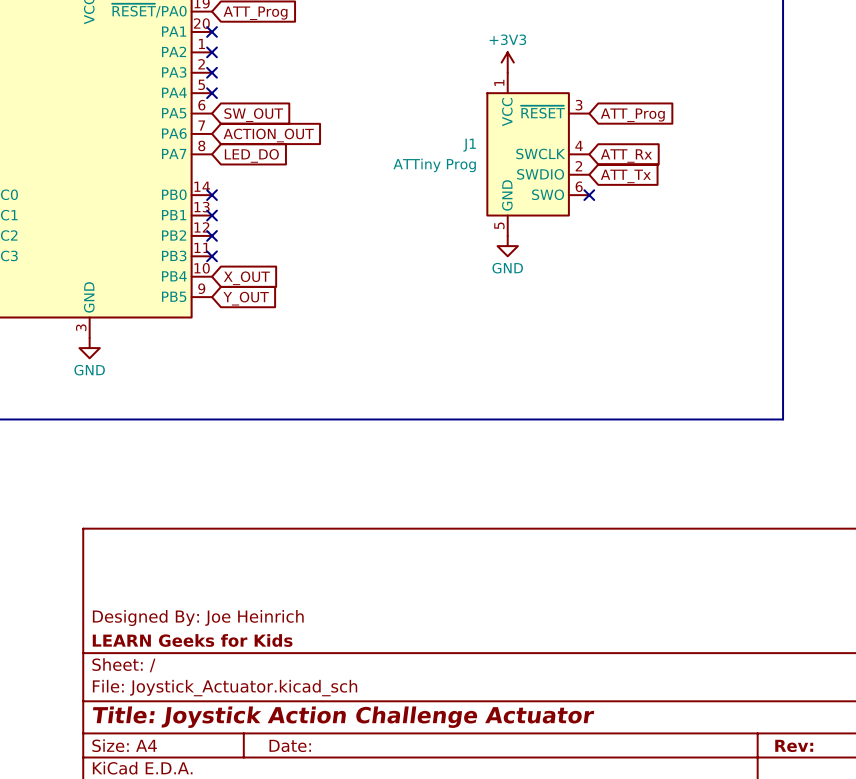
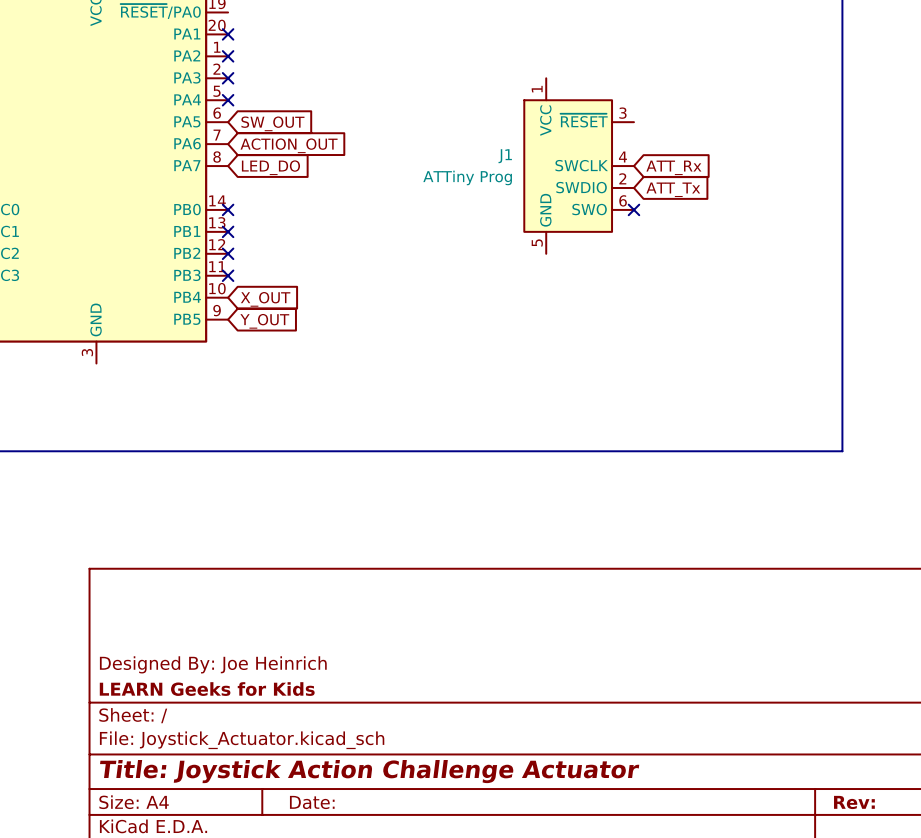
global label: ATT_Prog (255, 13) -> none
power symbol: +3V3 (507, 62) -> none
global label: ATT_Prog (632, 115) -> none
power symbol: GND (507, 246) -> none
power symbol: GND (89, 348) -> none

